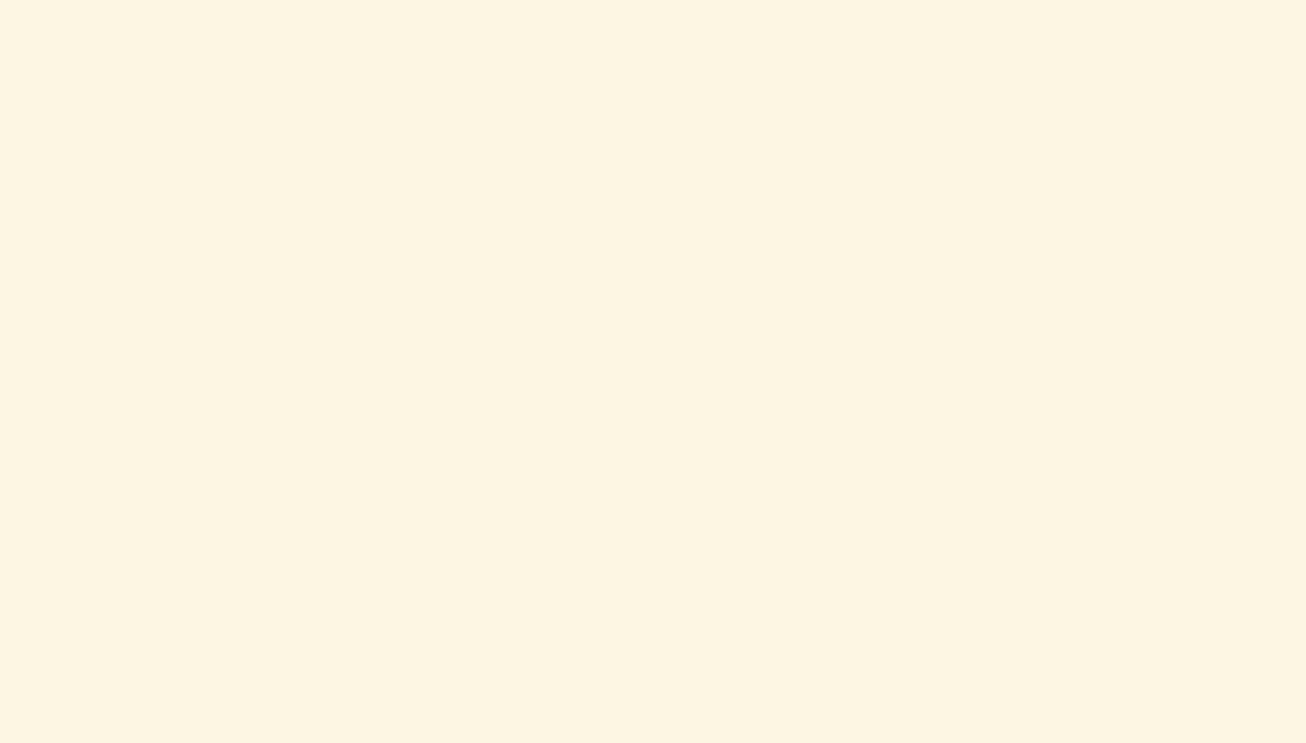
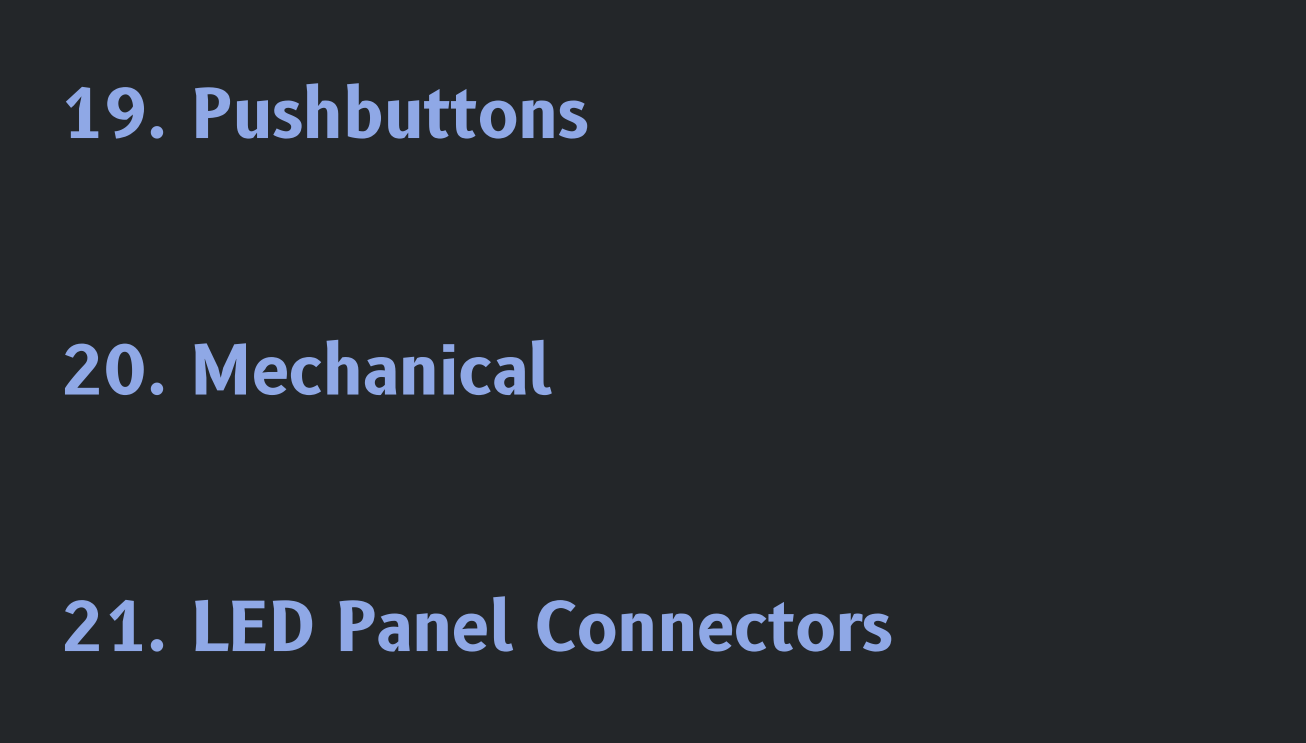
text: none -> 19. Pushbuttons (326, 110)
text: none -> 20. Mechanical (308, 367)
text: none -> 21. LED Panel Connectors (478, 623)

